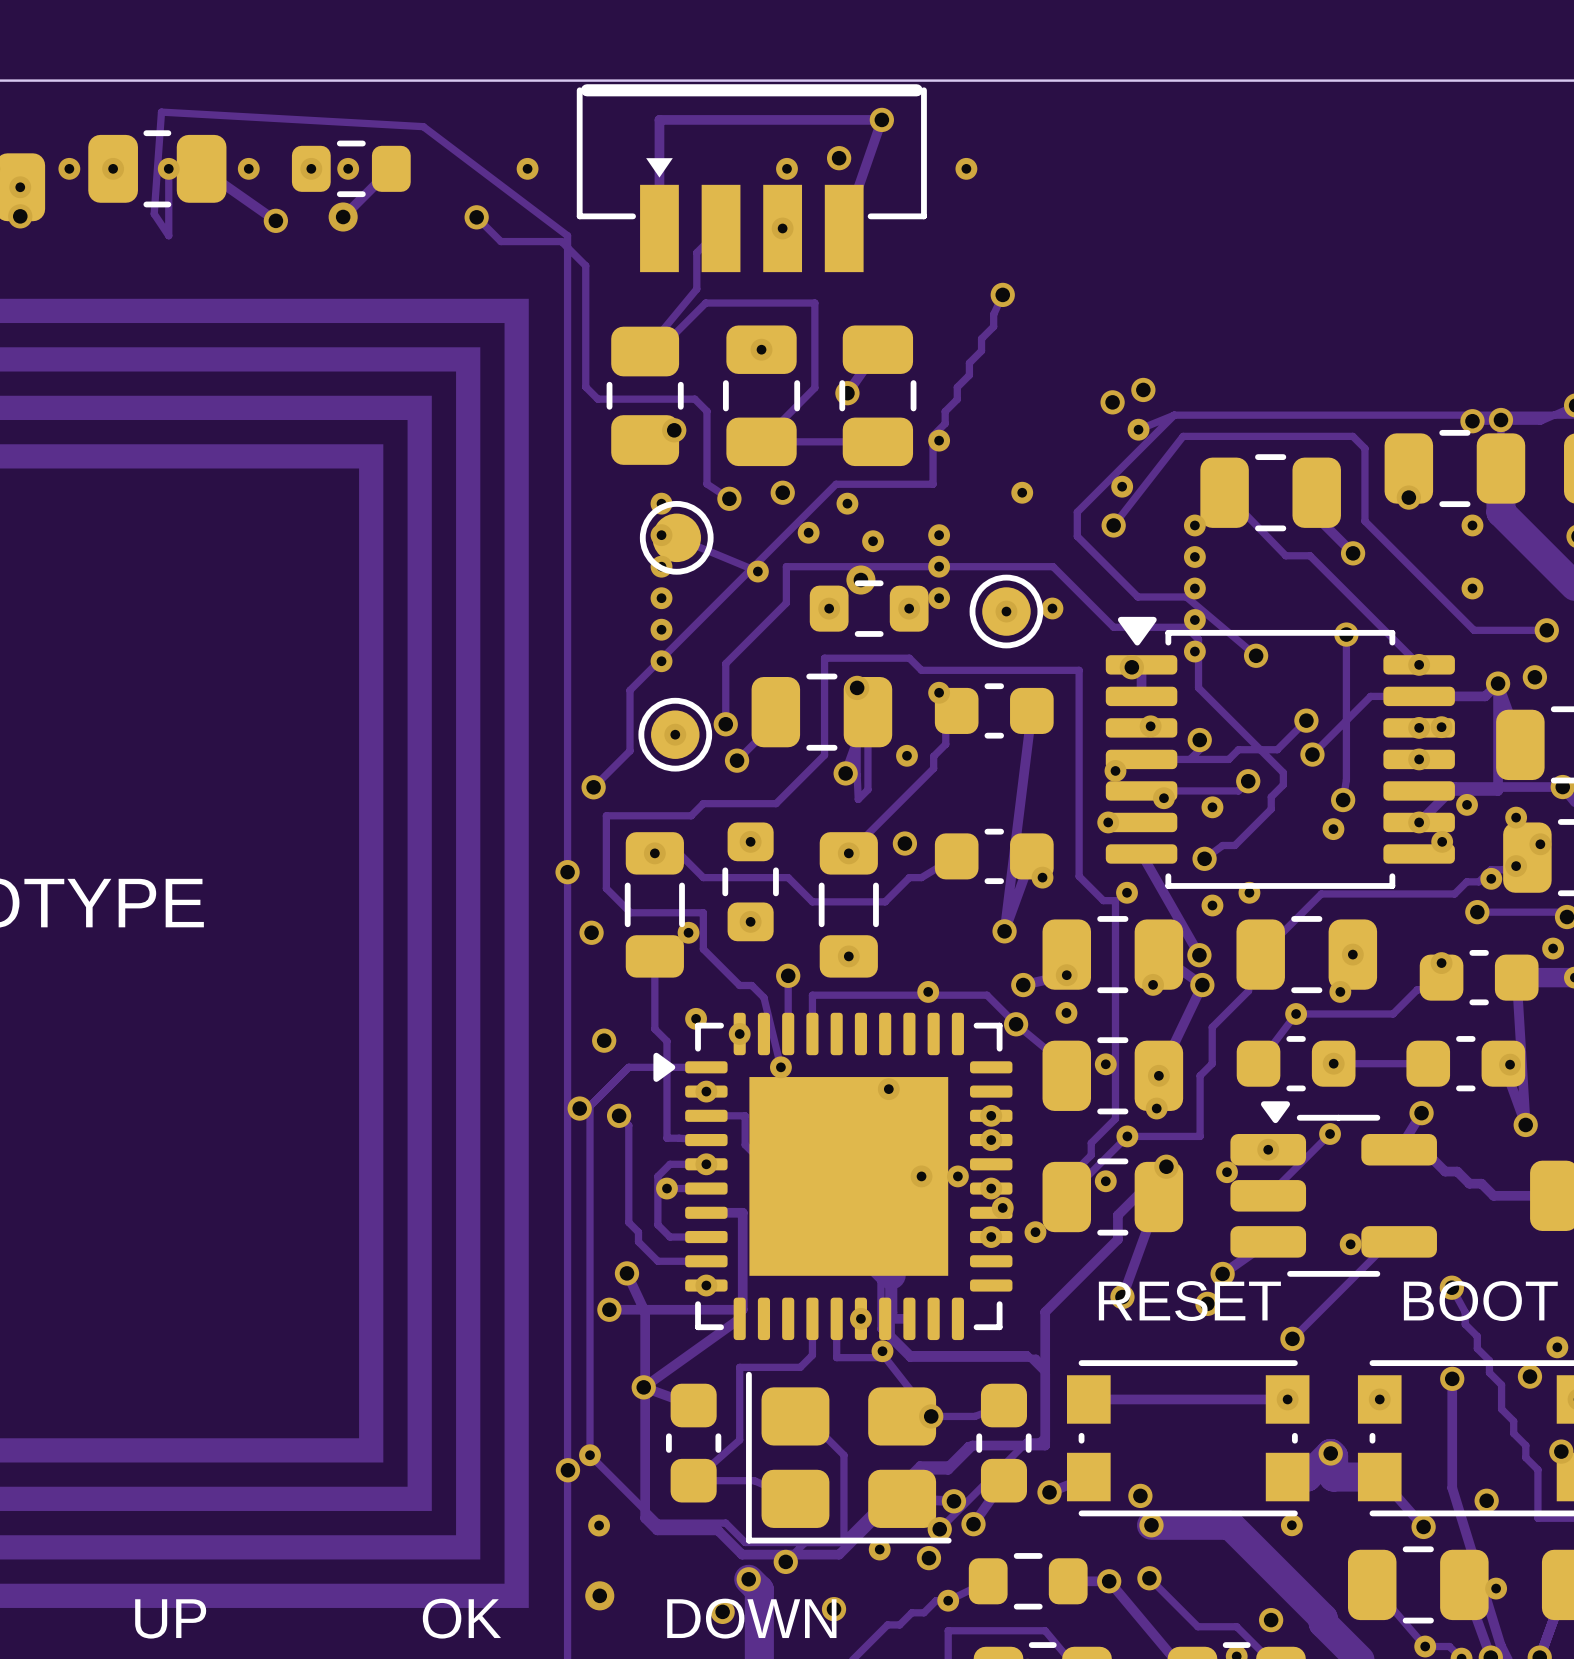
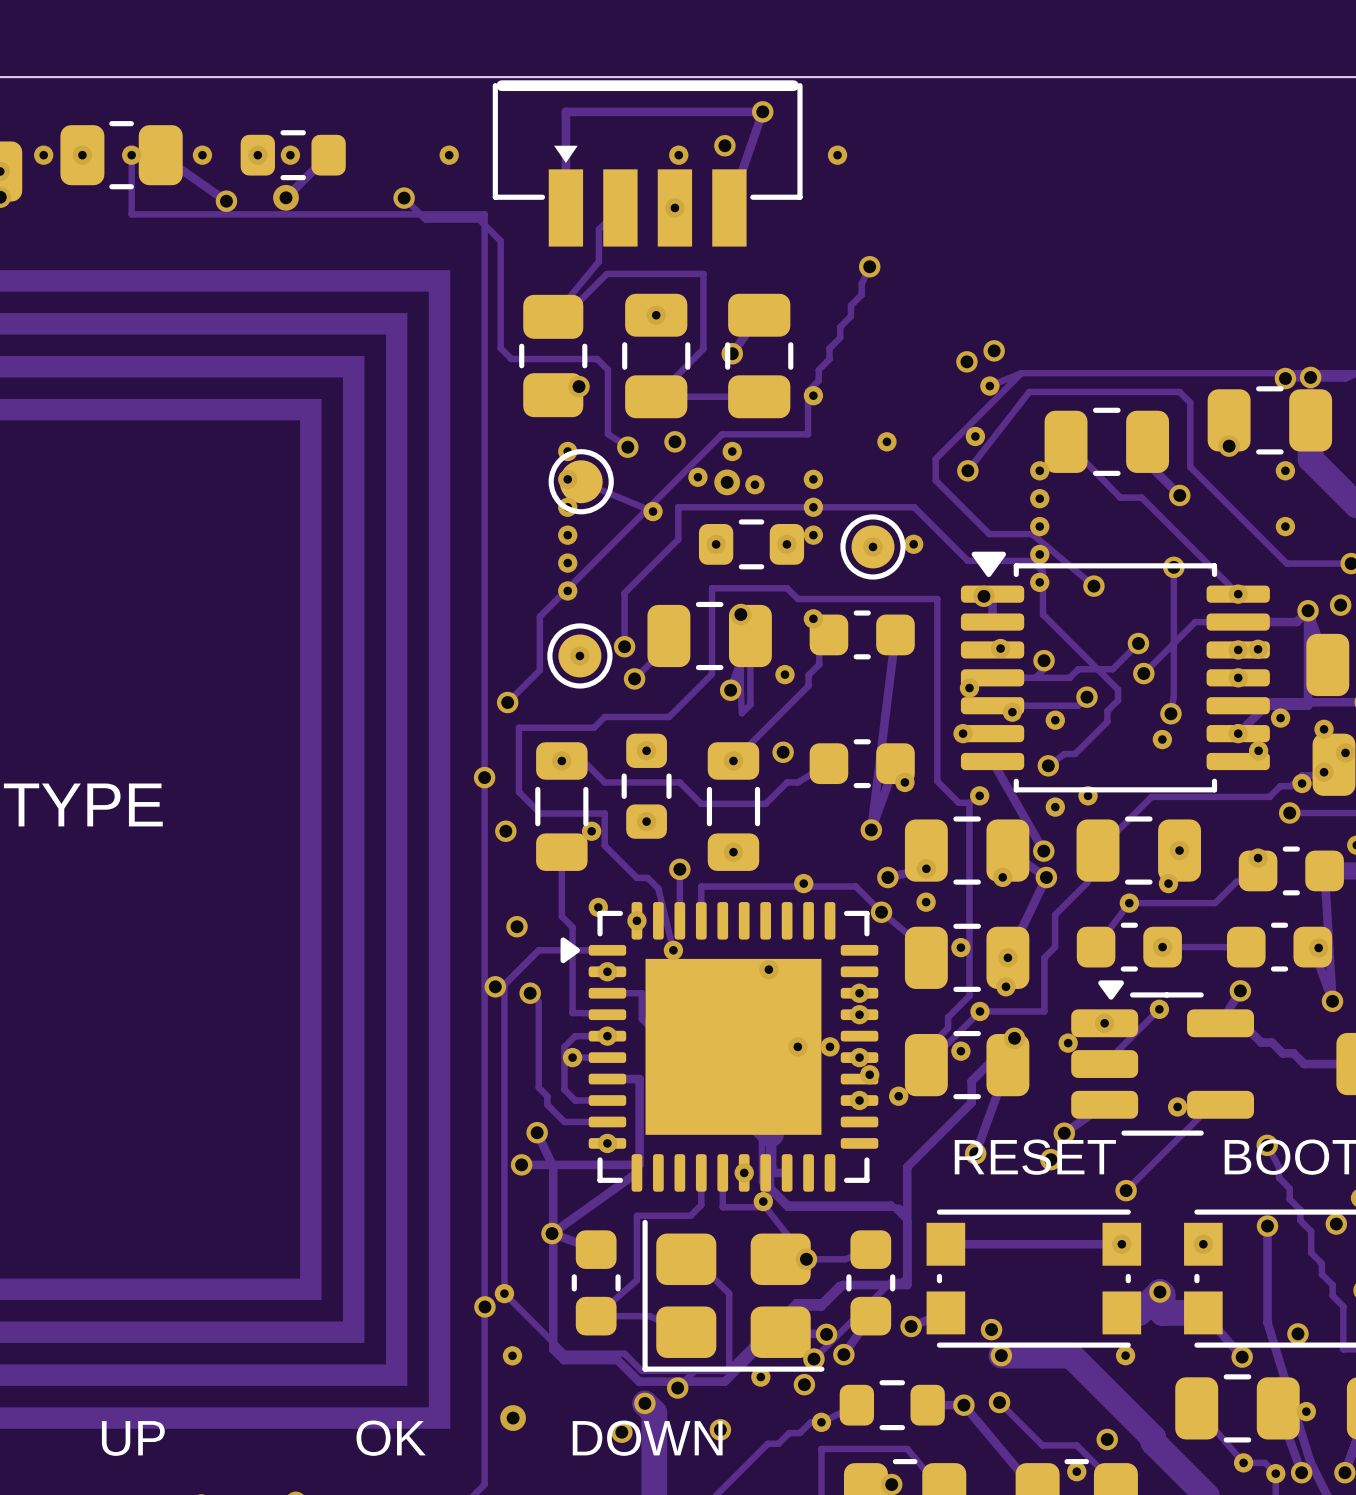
track: (168, 235) (154, 213) (161, 112) (423, 126) (567, 235) -> (131, 214) (484, 214)
via position: (860, 580) -> (727, 482)

